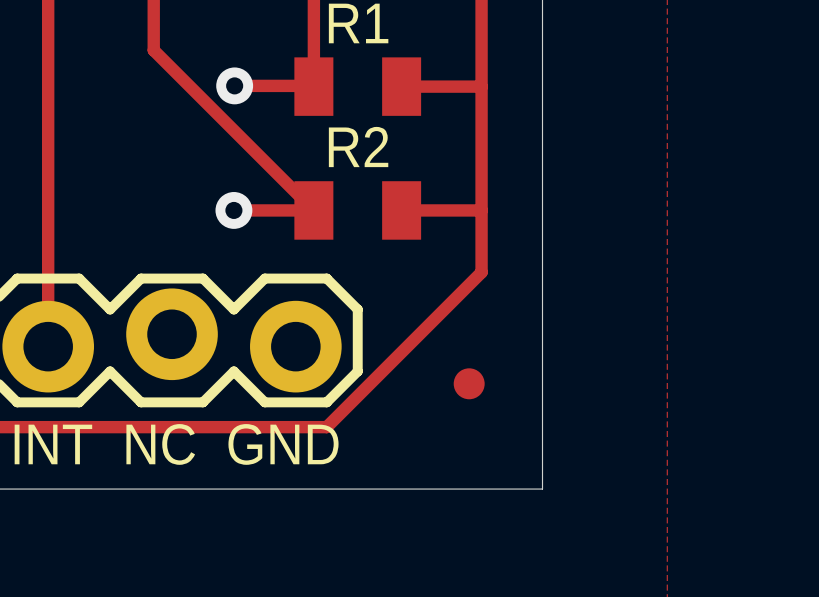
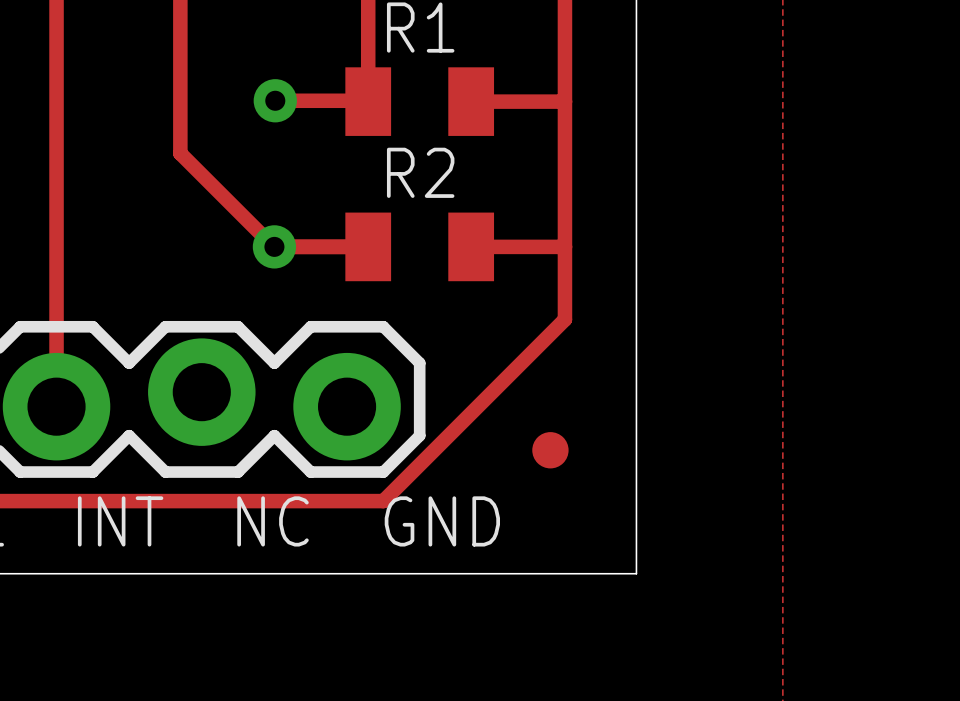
track: (153, 50) (313, 210) -> (180, 59) (180, 153) (273, 246)

